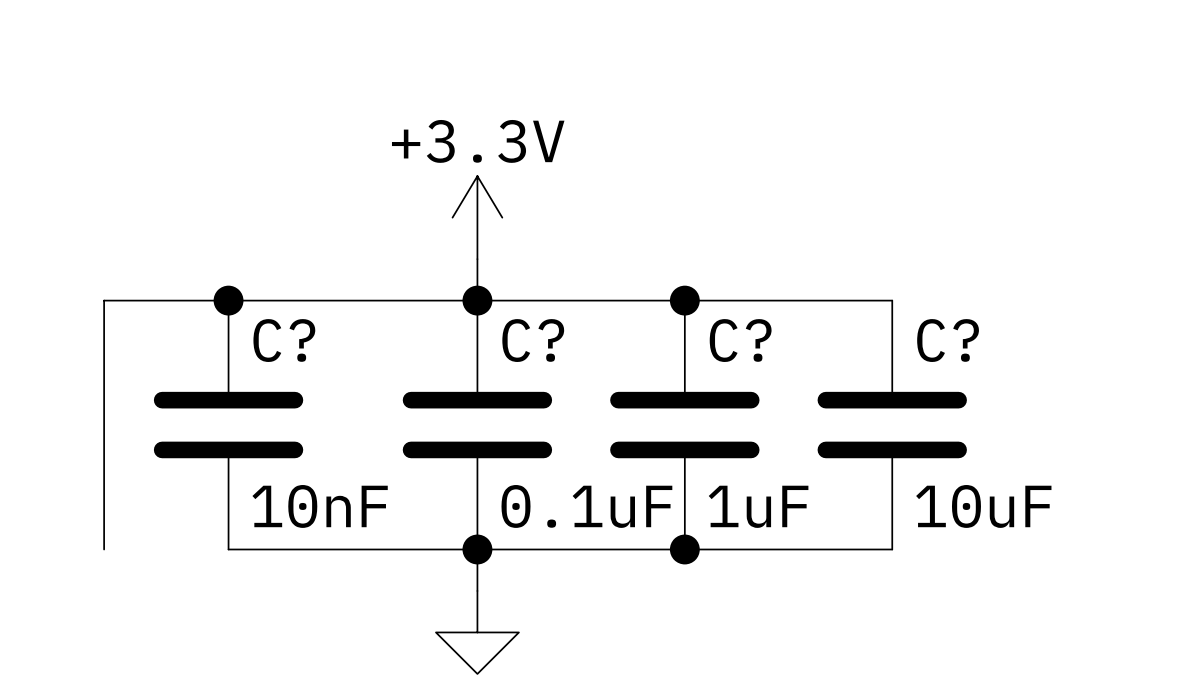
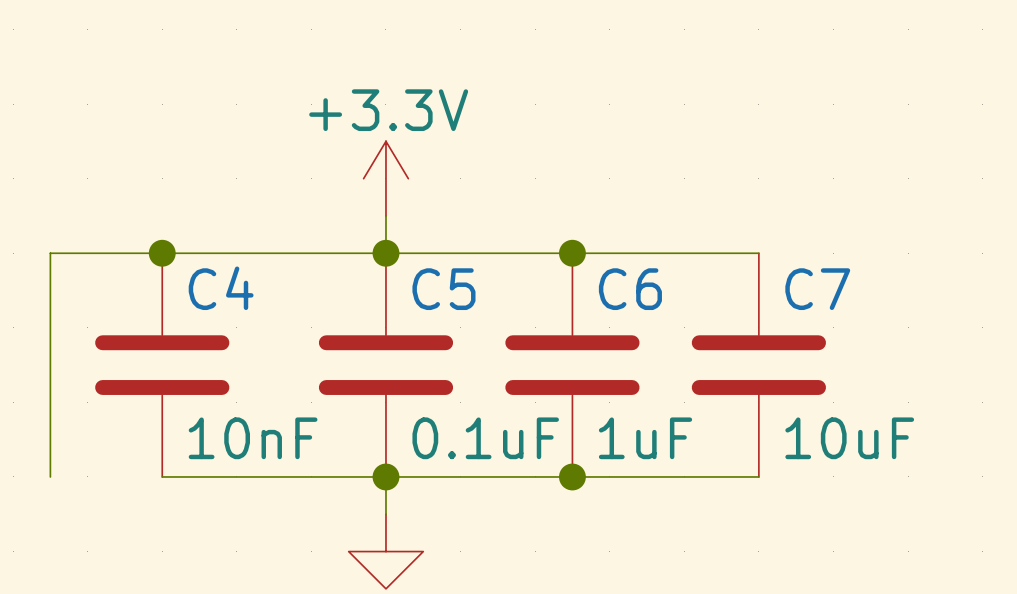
C? name: C? (284, 340) -> C4 (221, 288)
C? name: C? (533, 340) -> C5 (443, 289)
C? name: C? (740, 340) -> C6 (630, 289)
C? name: C? (948, 340) -> C7 (817, 289)

